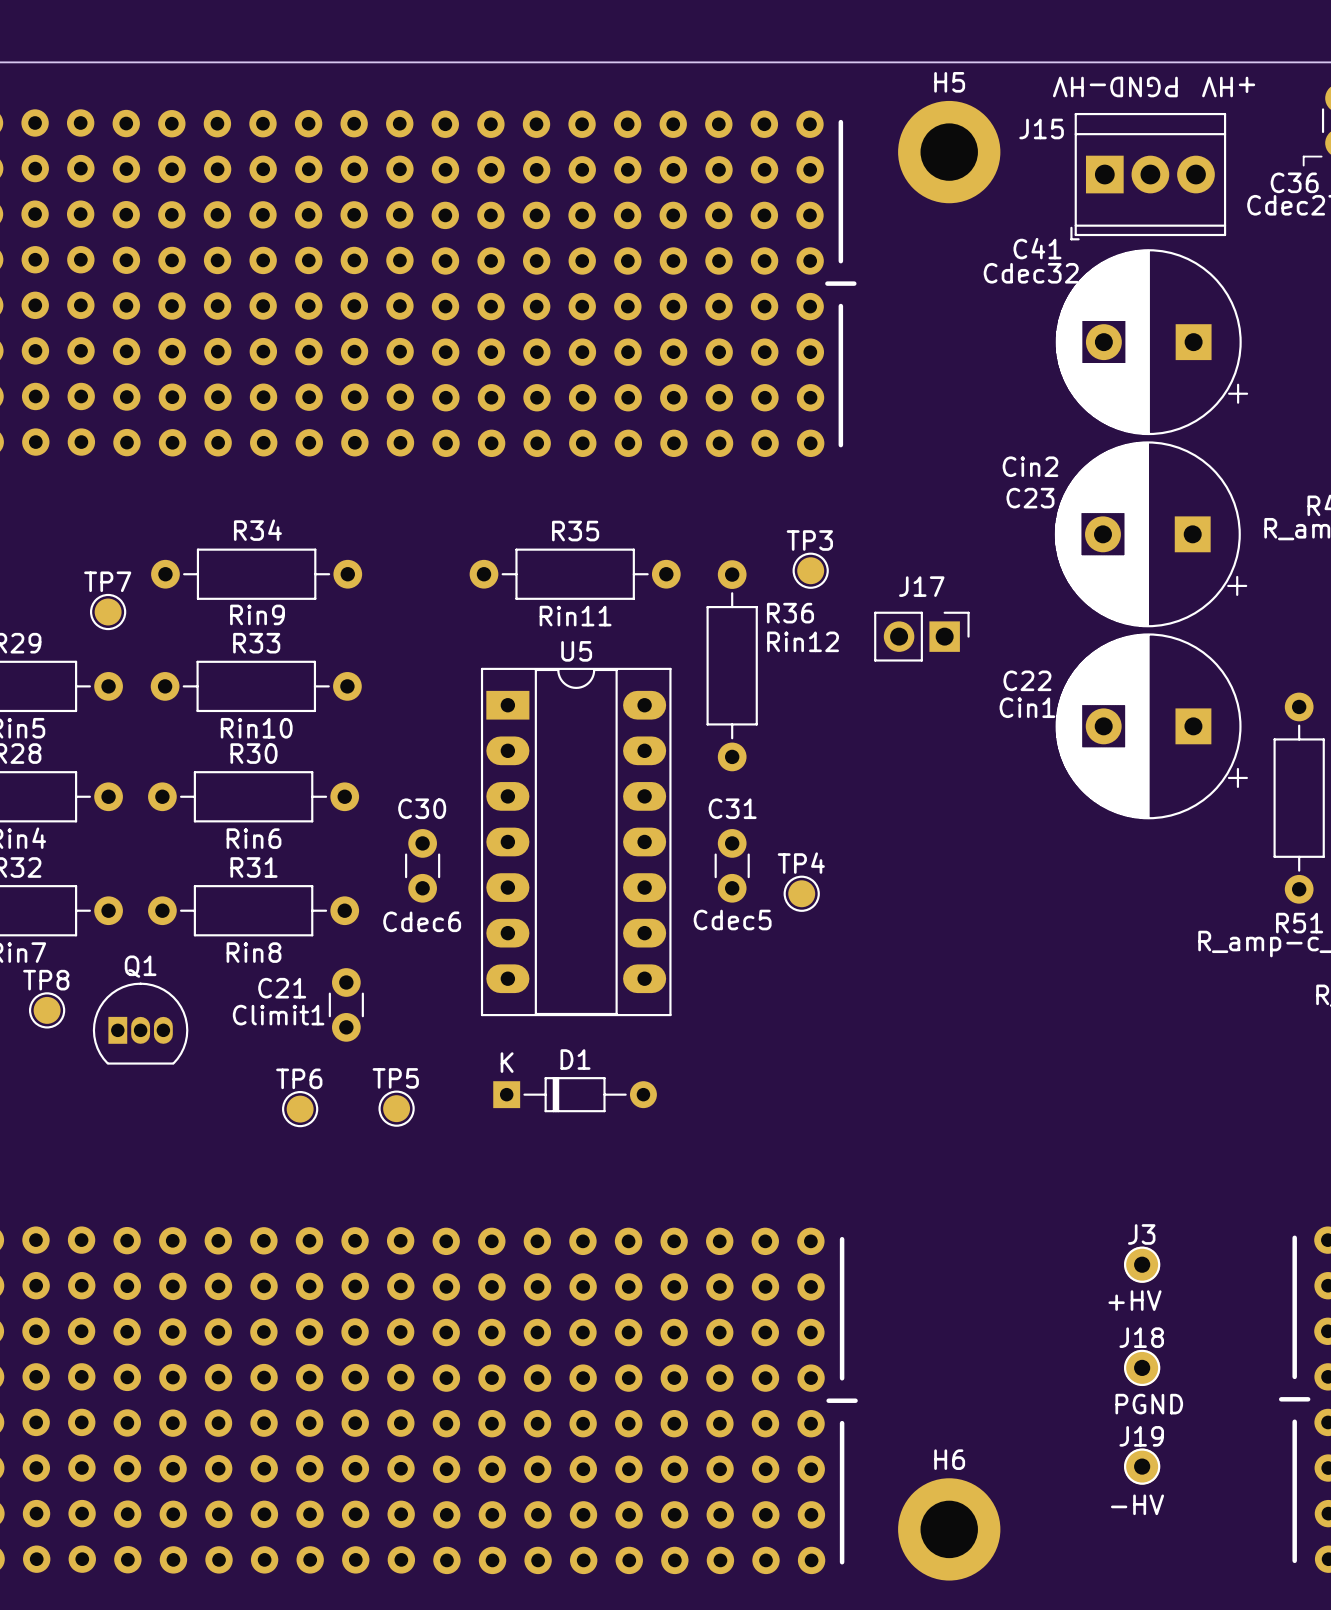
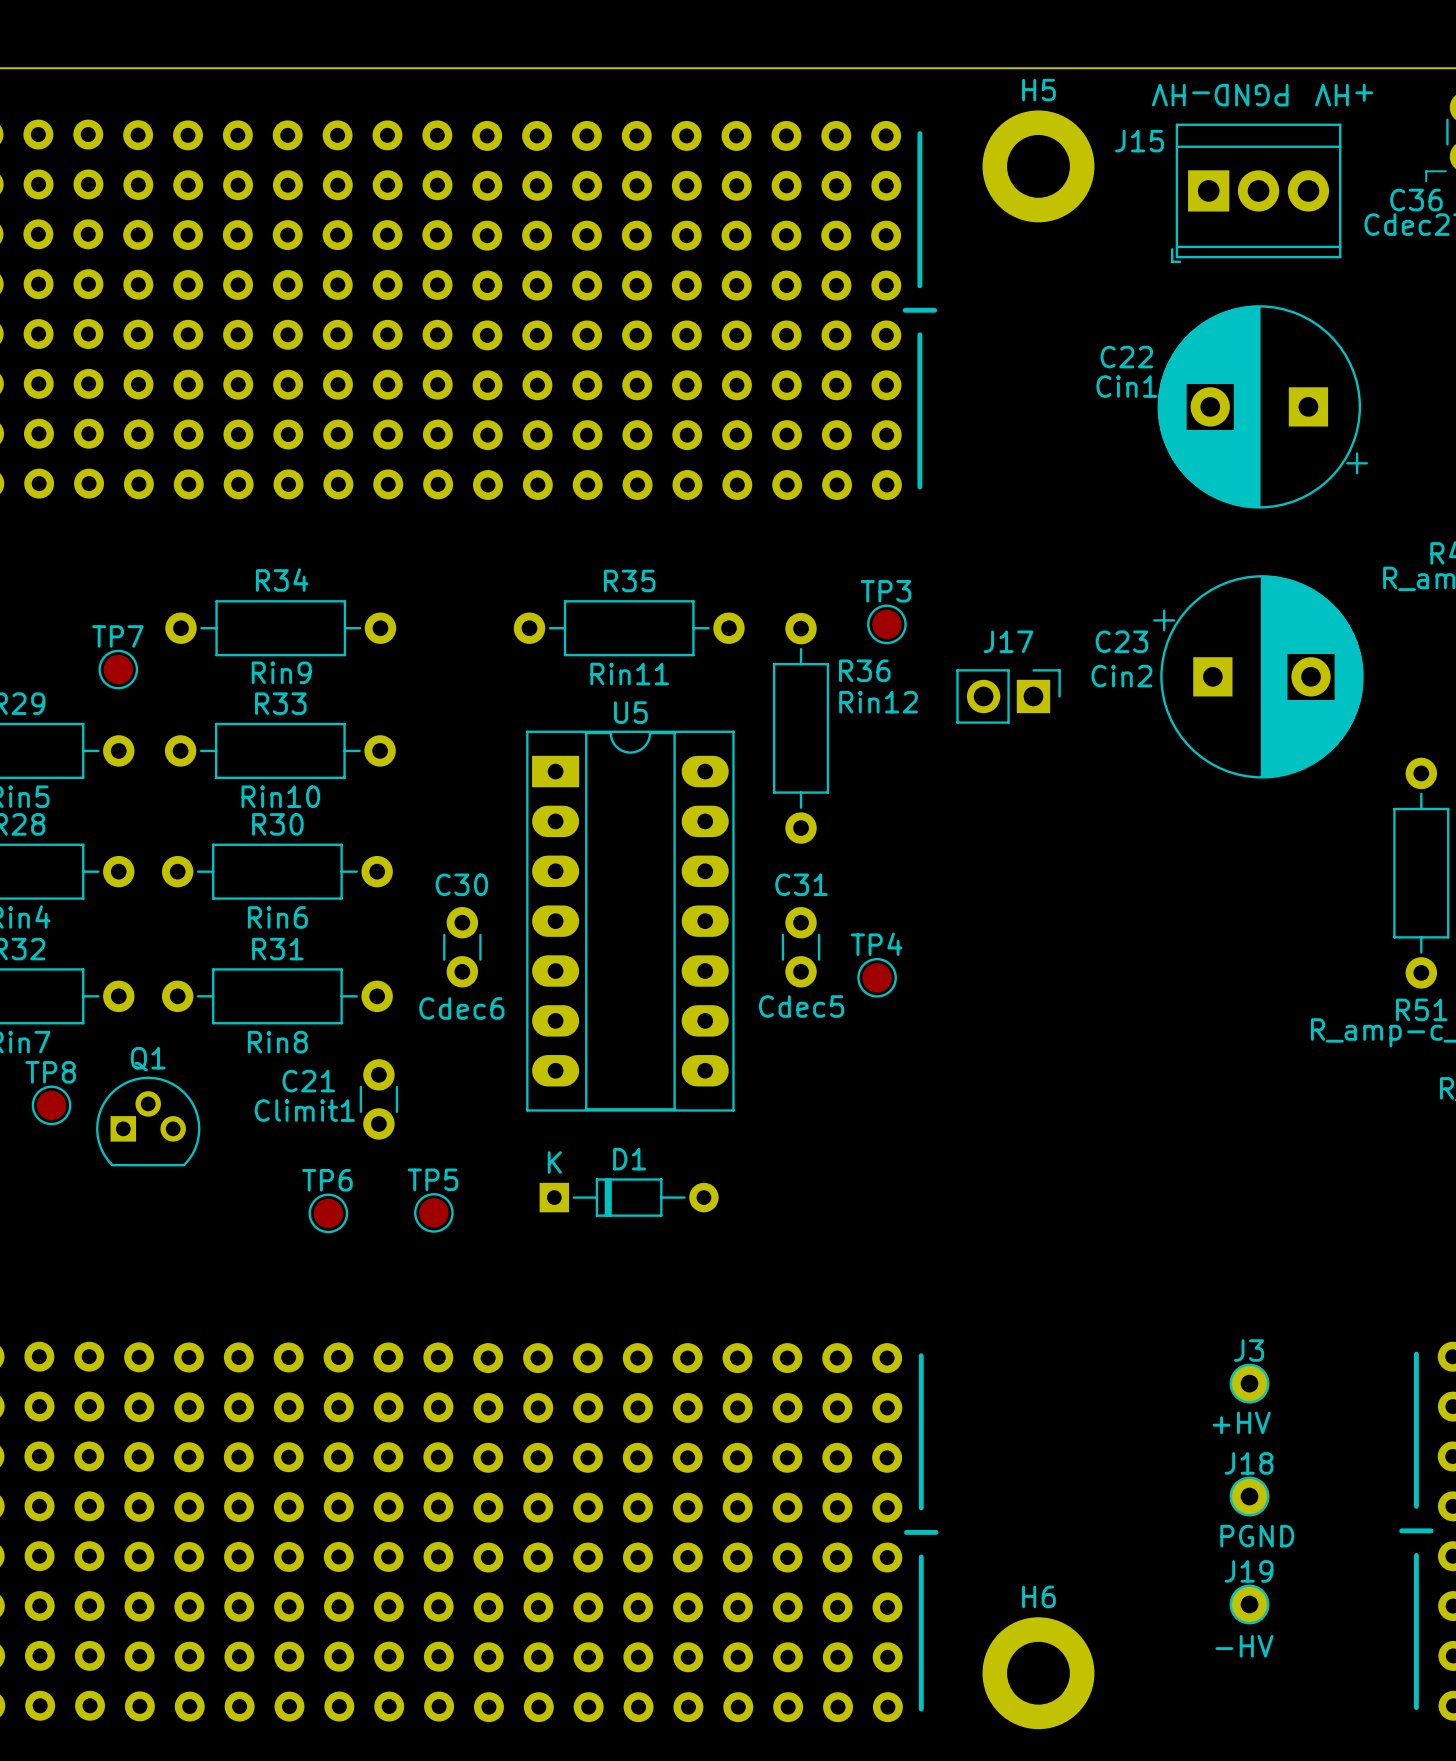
C41: Cdec32 (1151, 342) -> none
C23 value position: Cin2 (1030, 466) -> Cin2 (1121, 676)
C23 rotation: 0° (1151, 534) -> 180° (1258, 676)
C22 position: (1151, 726) -> (1262, 406)
Q1 footprint: [92, 982, 189, 1065] -> [96, 1076, 201, 1167]

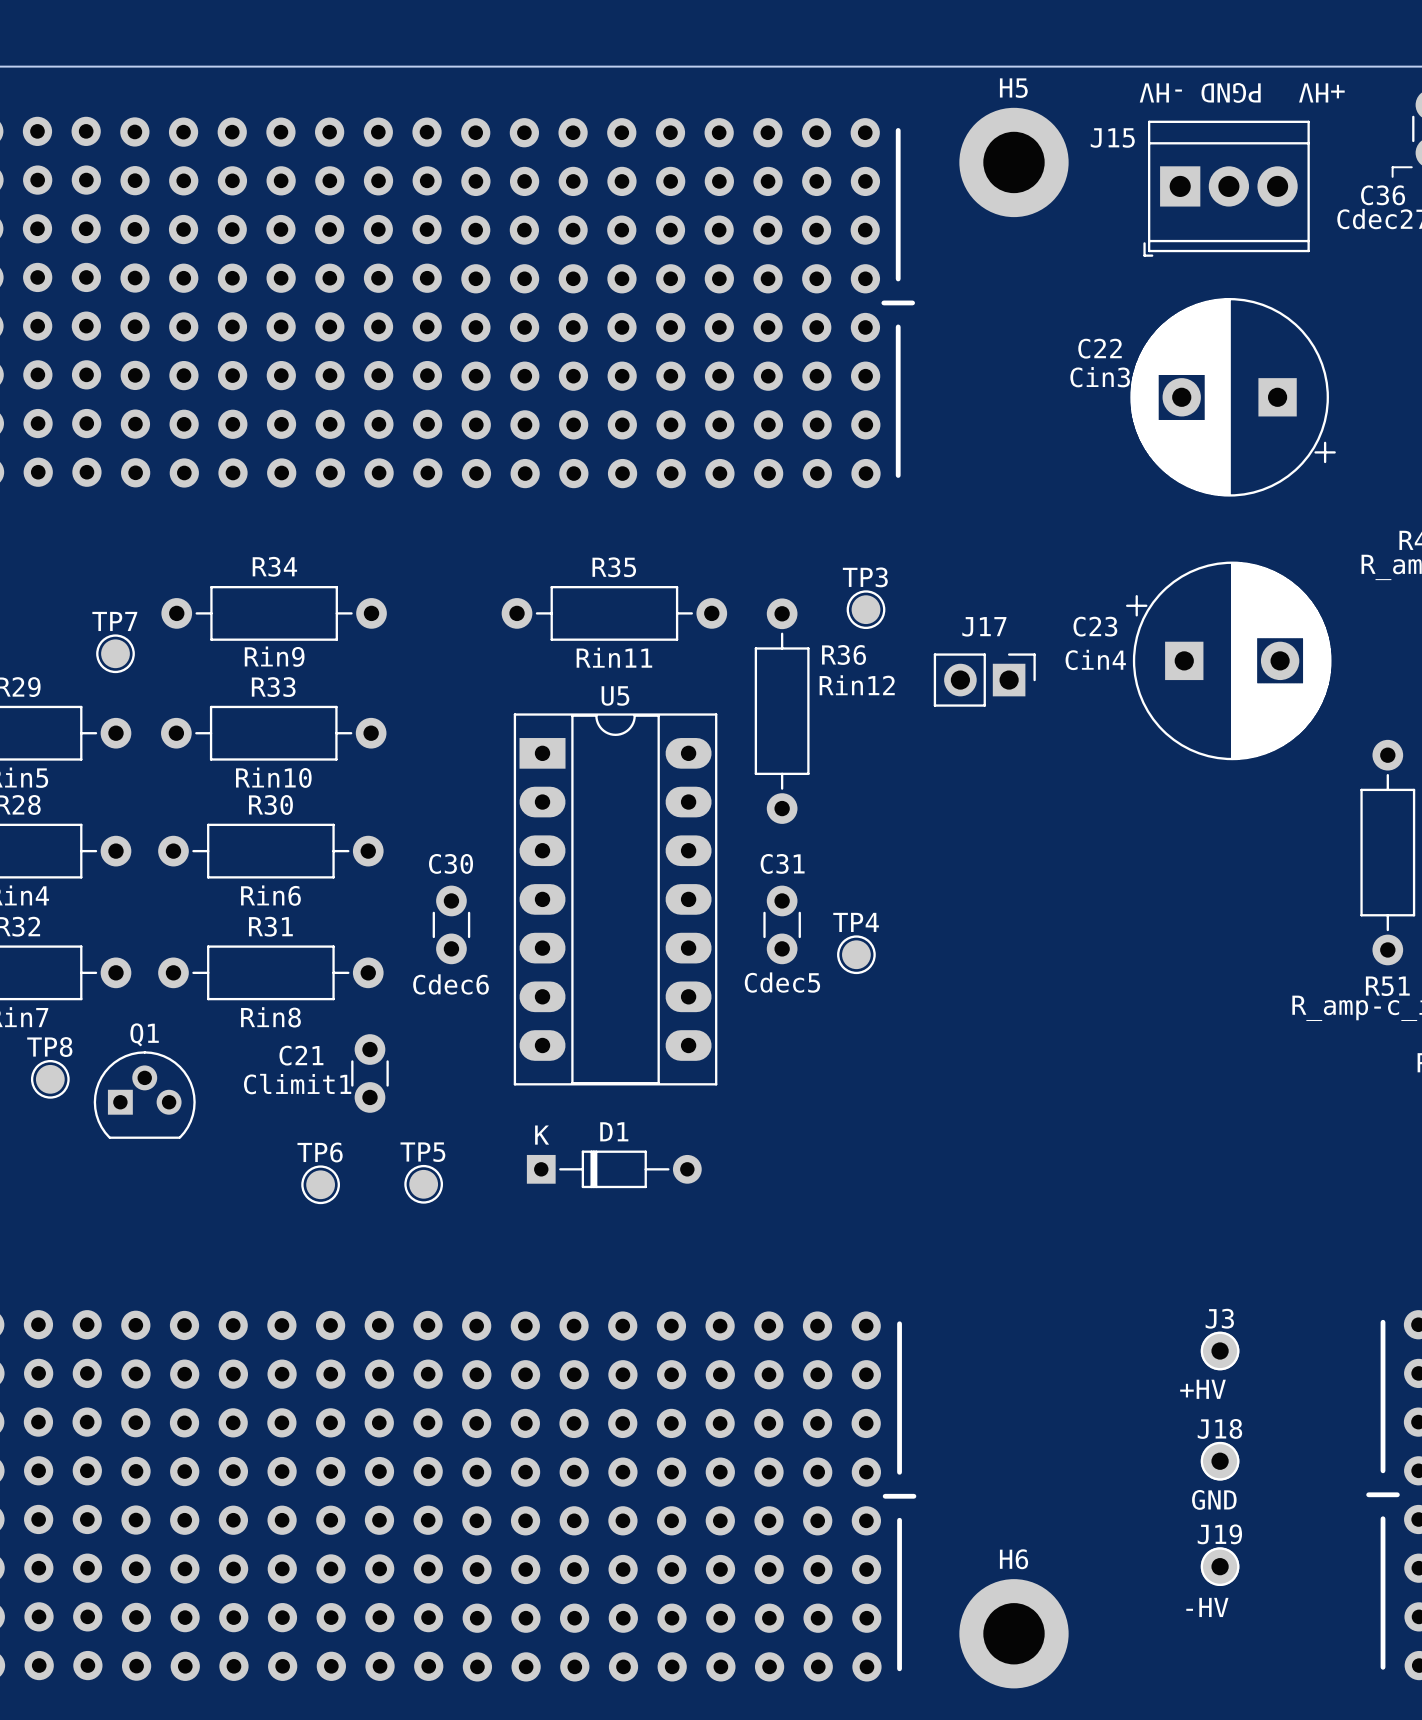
C22 value: Cin1 (1126, 386) -> Cin3 (1100, 377)
C23 value: Cin2 (1121, 676) -> Cin4 (1095, 659)
text: PGND (1257, 1536) -> GND (1214, 1499)

